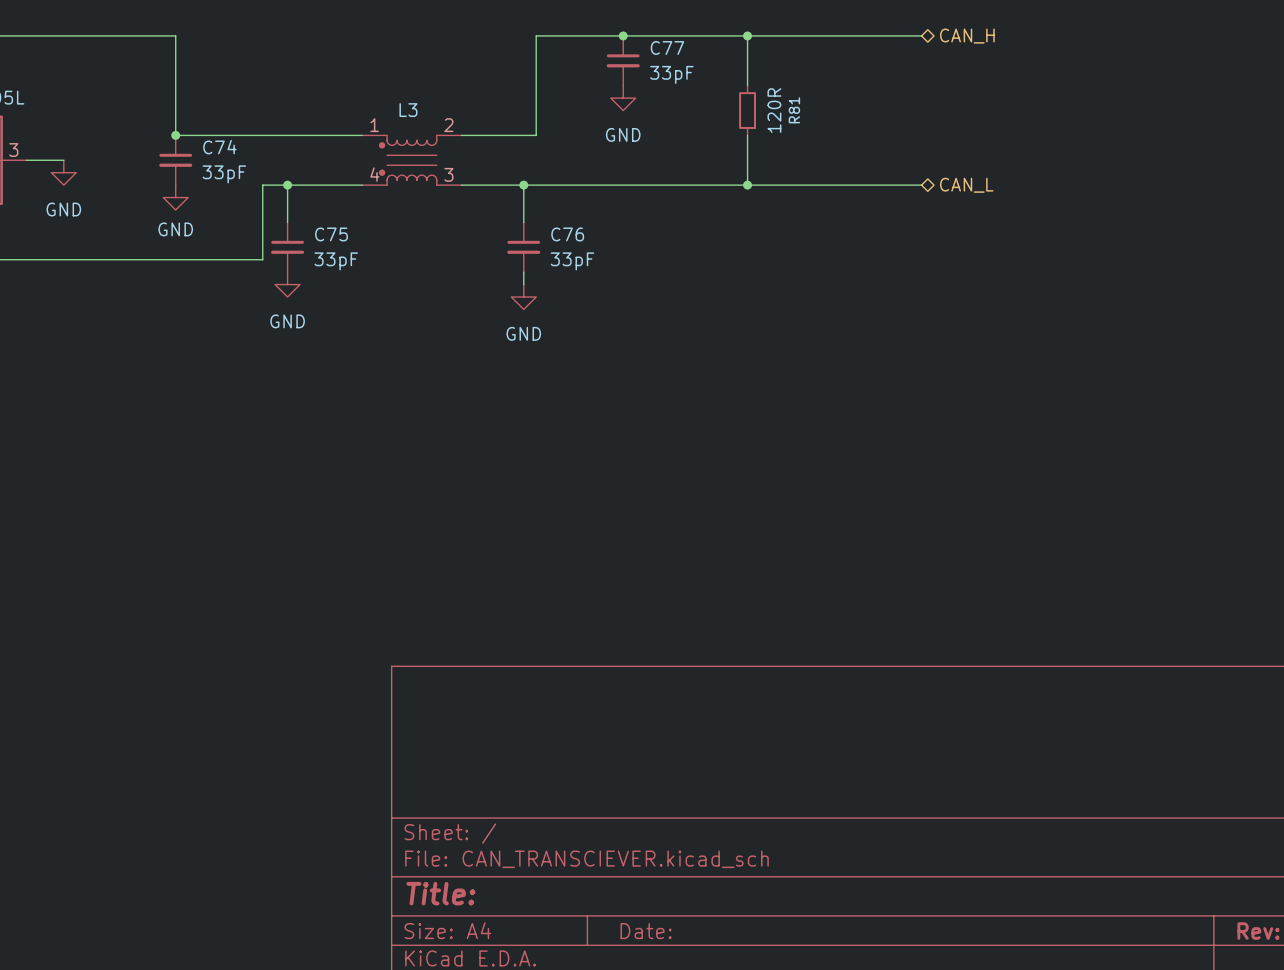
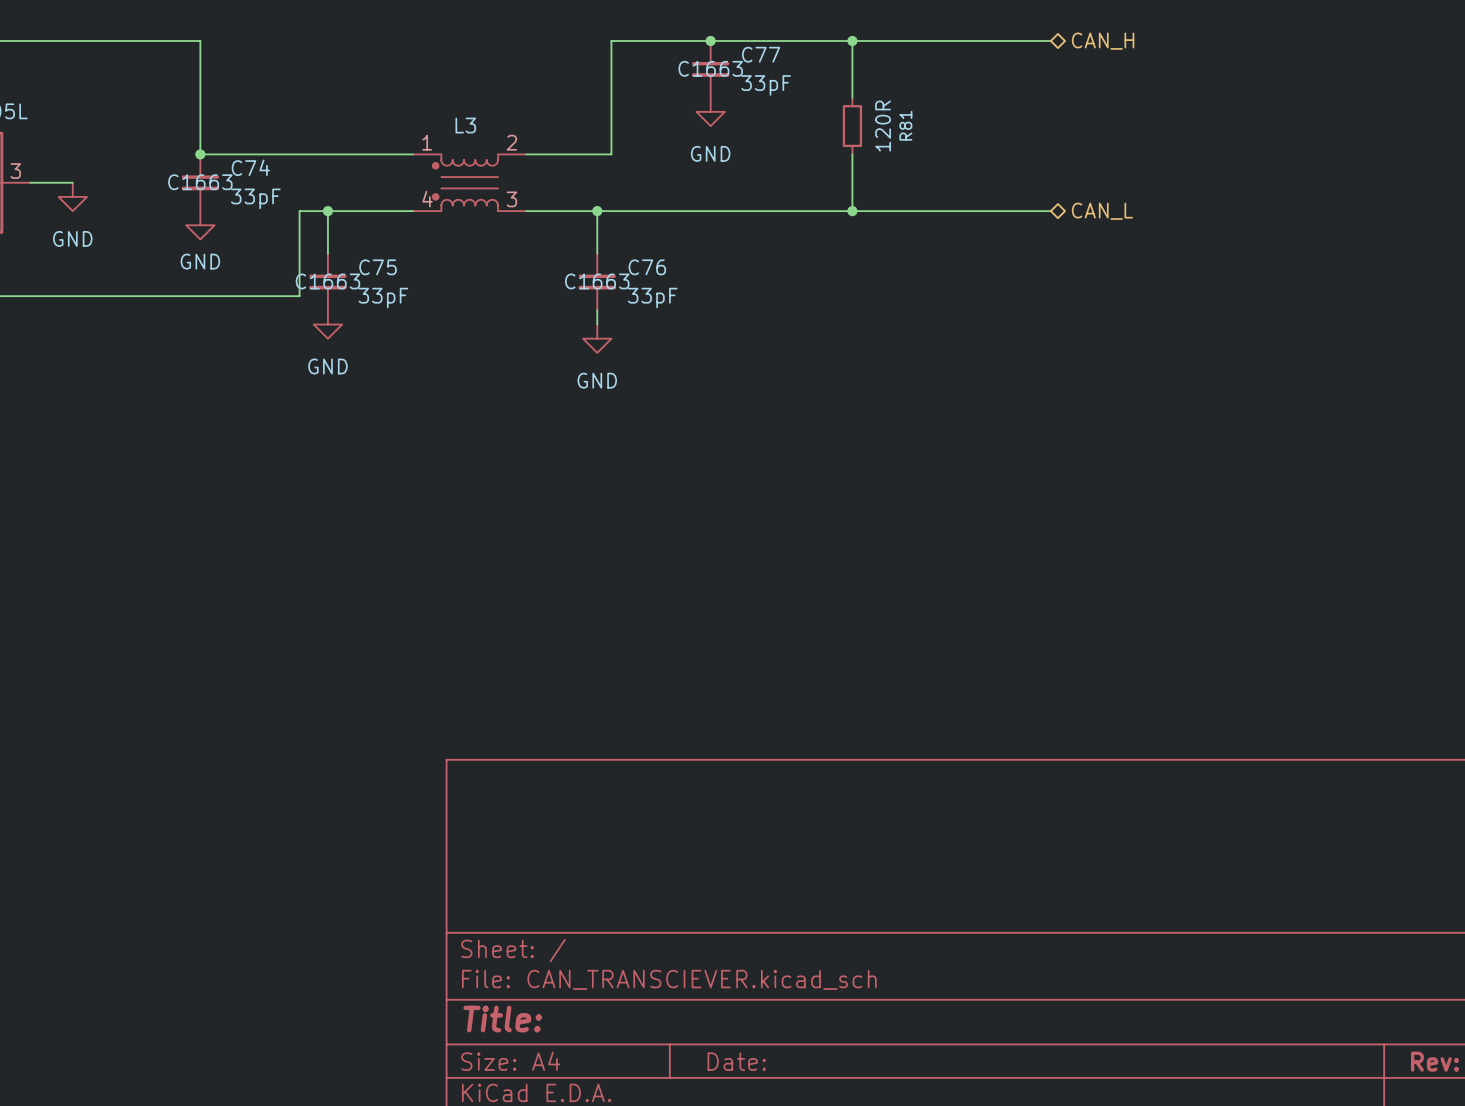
C77 text: none -> C1663 (710, 68)
C74 text: none -> C1663 (200, 182)
C75 text: none -> C1663 (327, 281)
C76 text: none -> C1663 (597, 281)

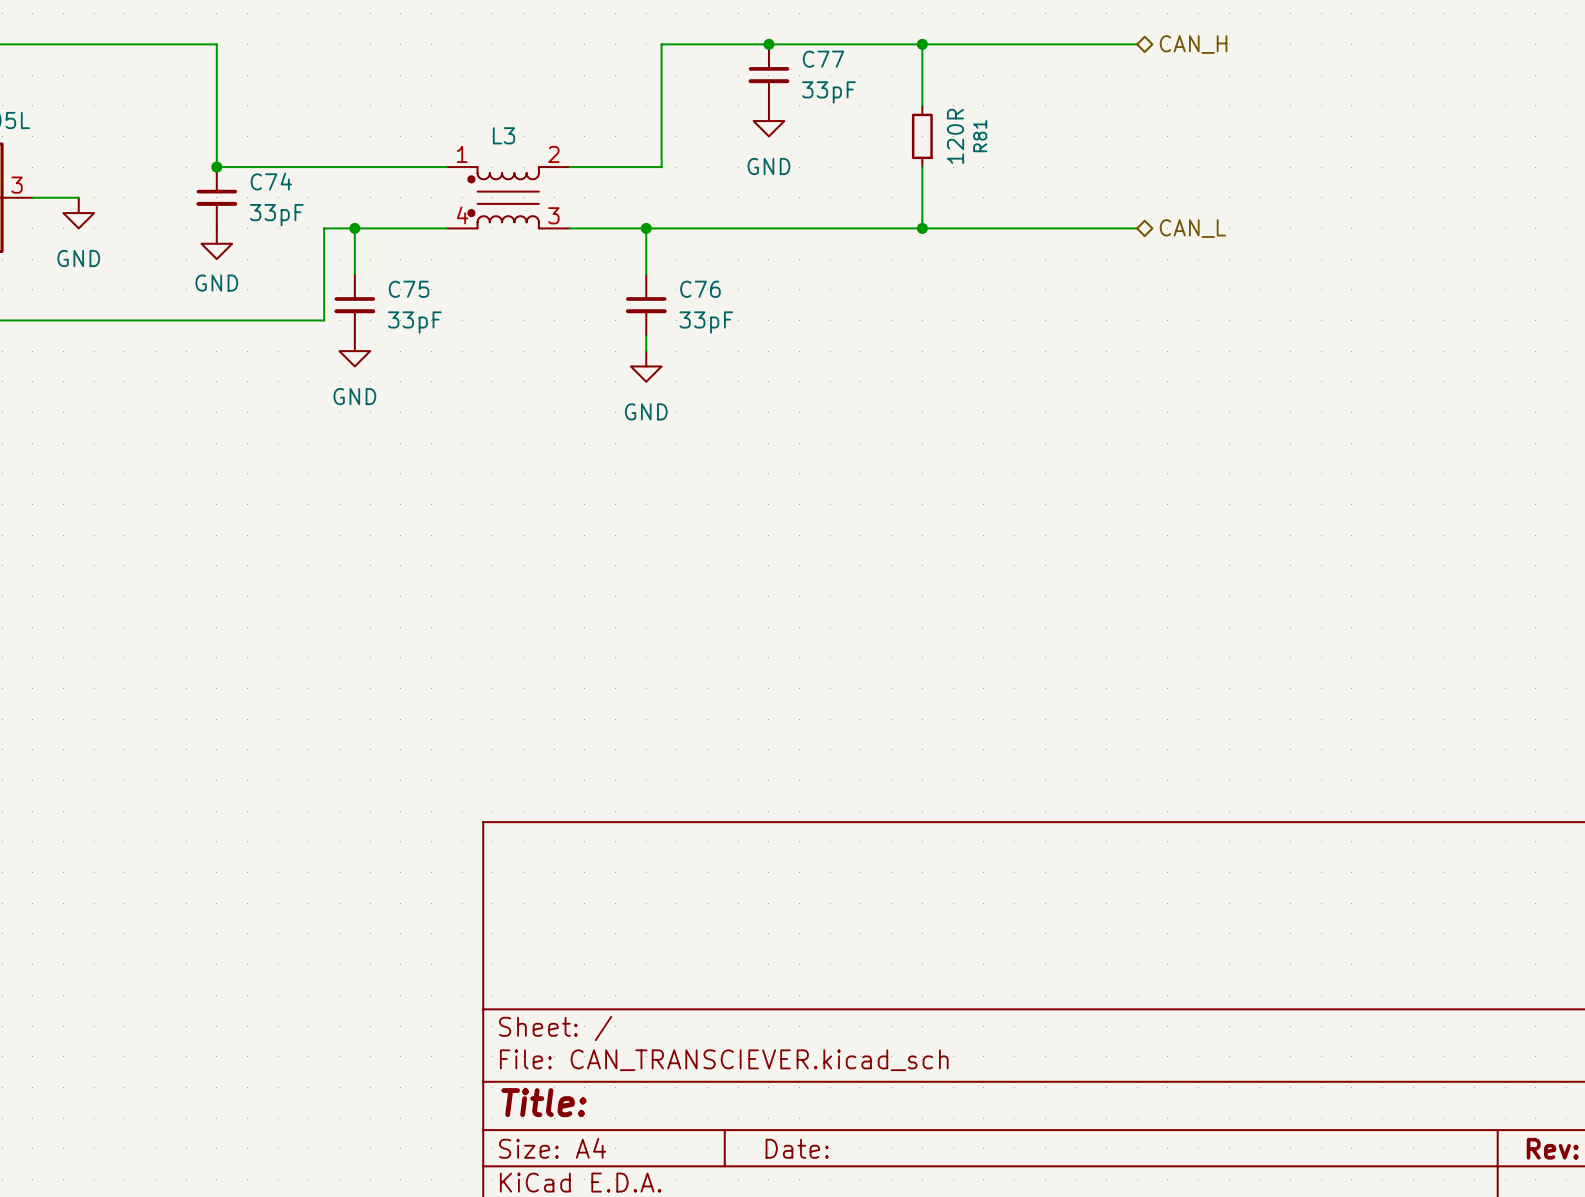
C77 text: C1663 (710, 68) -> none
C74 text: C1663 (200, 182) -> none
C75 text: C1663 (327, 281) -> none
C76 text: C1663 (597, 281) -> none

